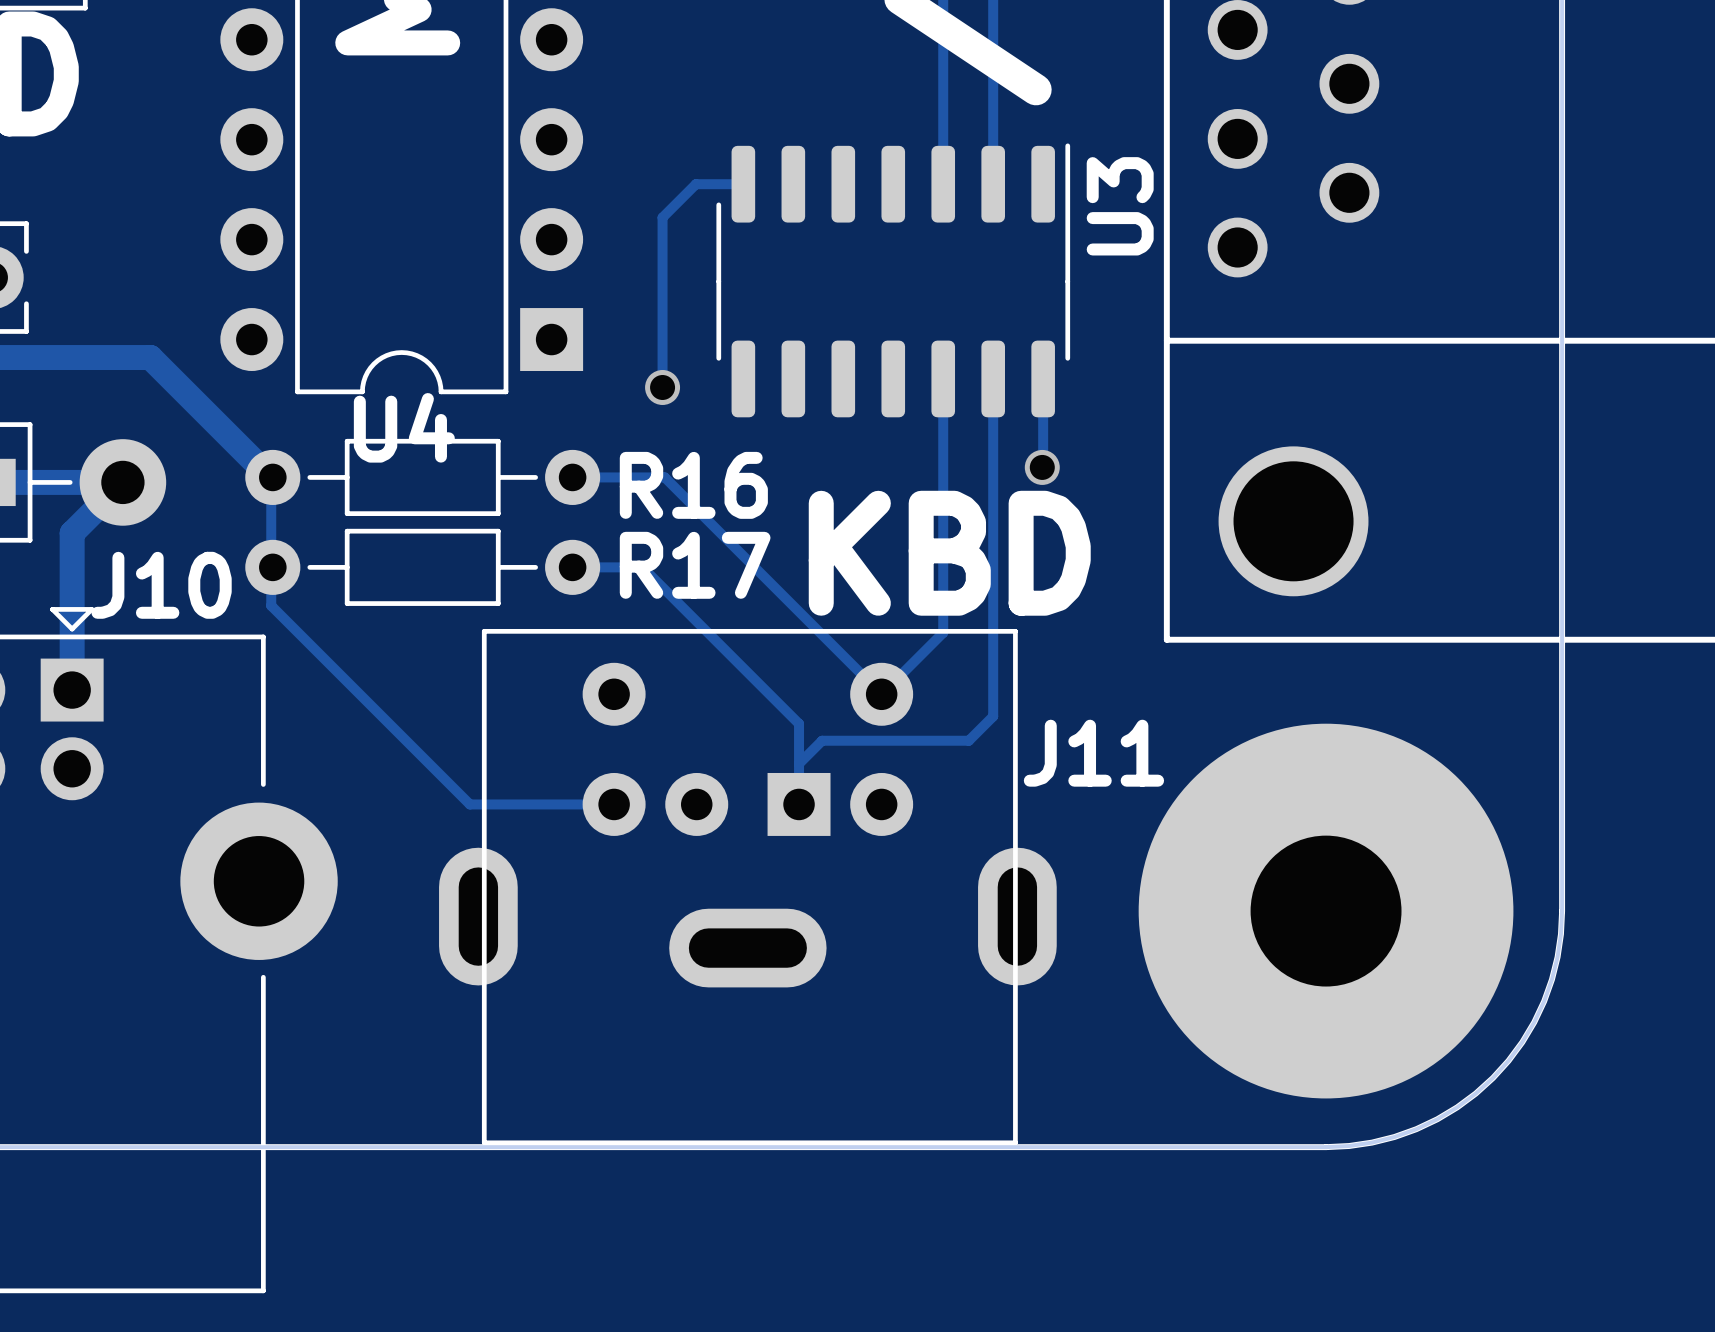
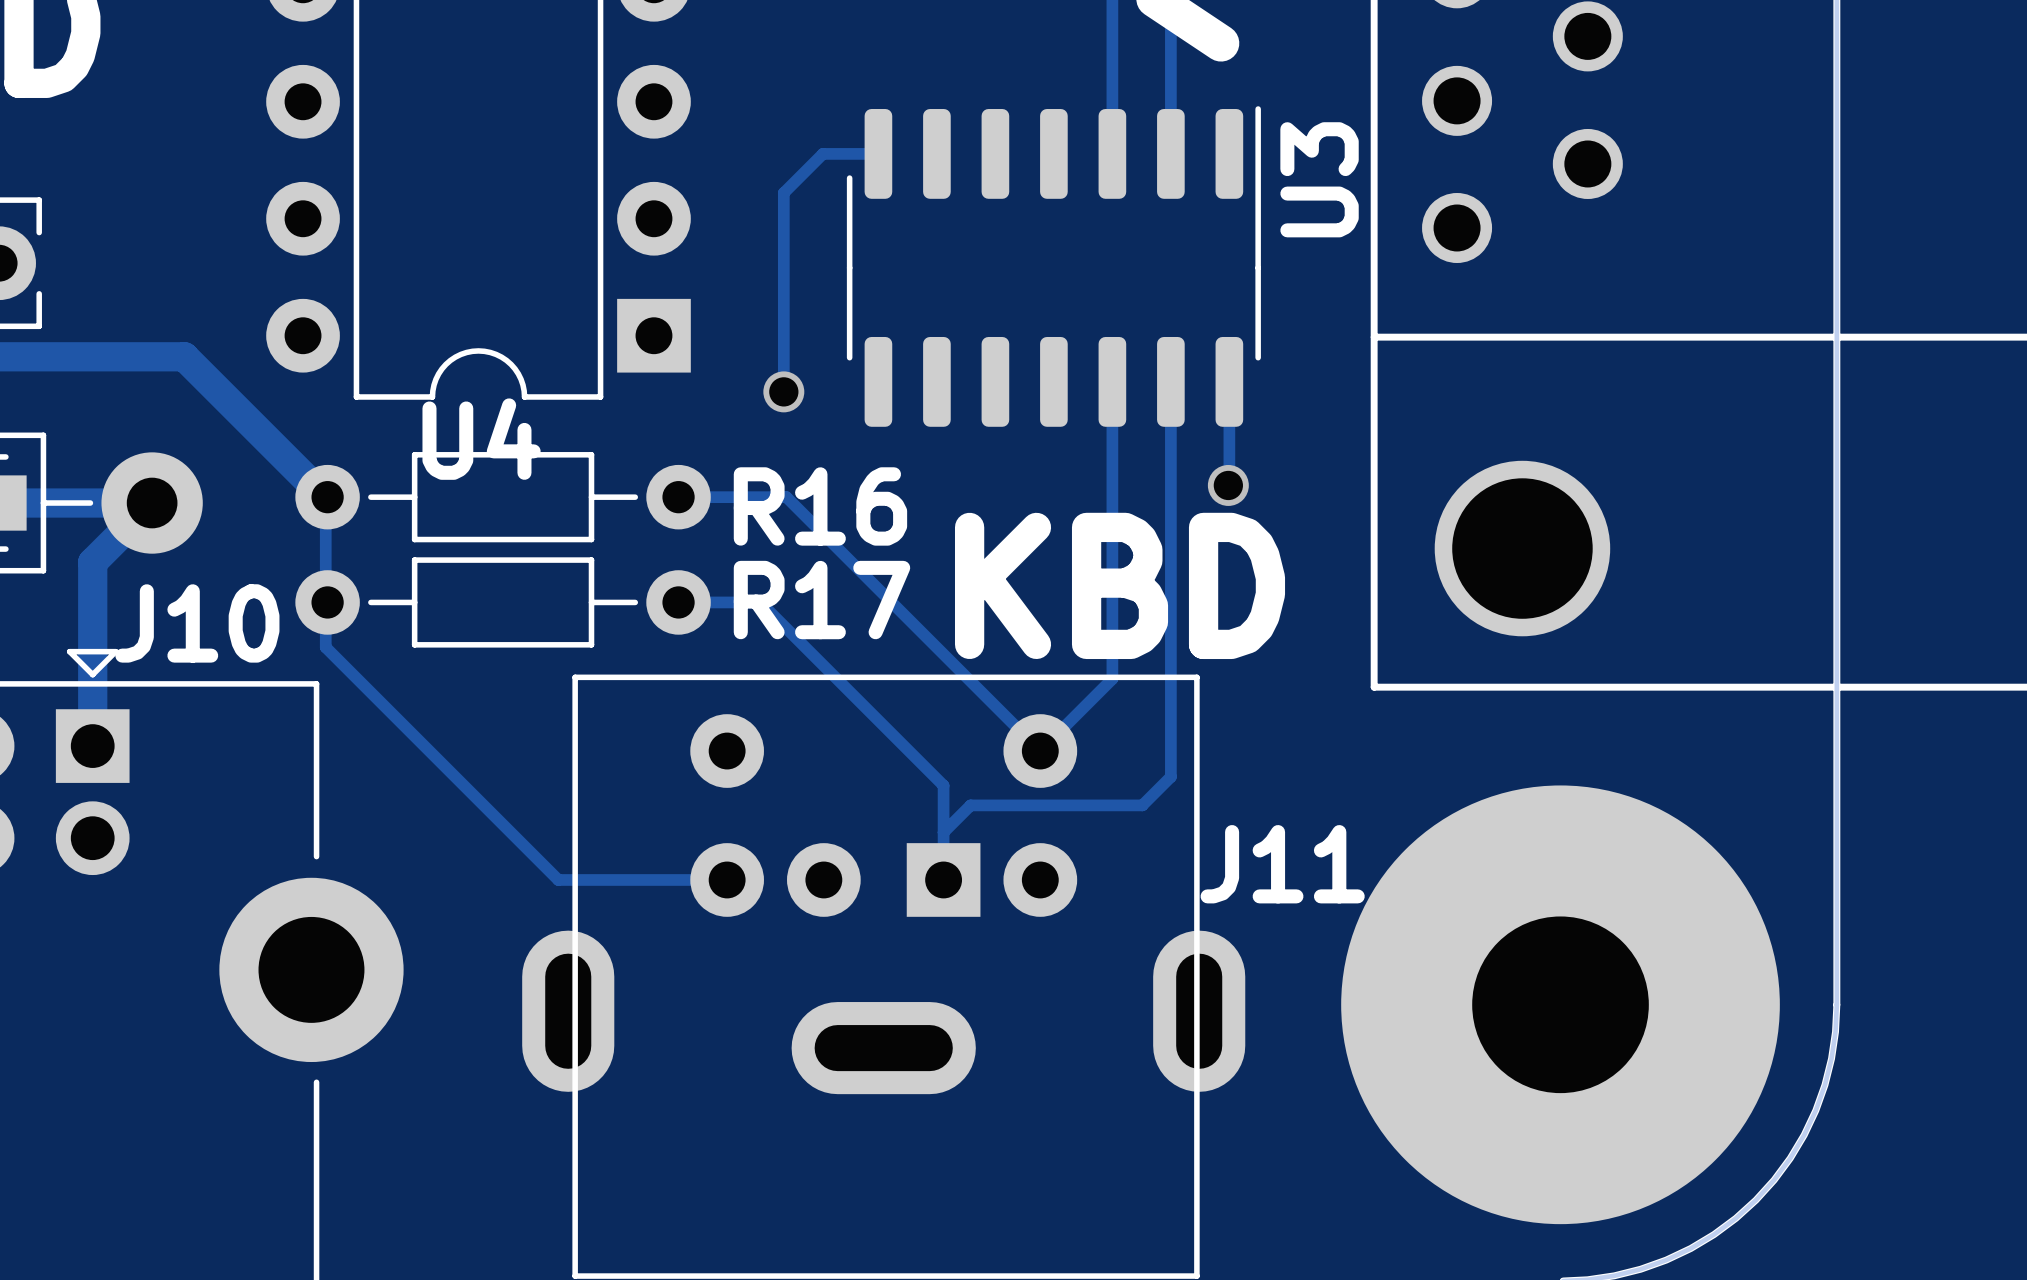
J11 name position: J11 (1093, 753) -> J11 (1282, 864)

